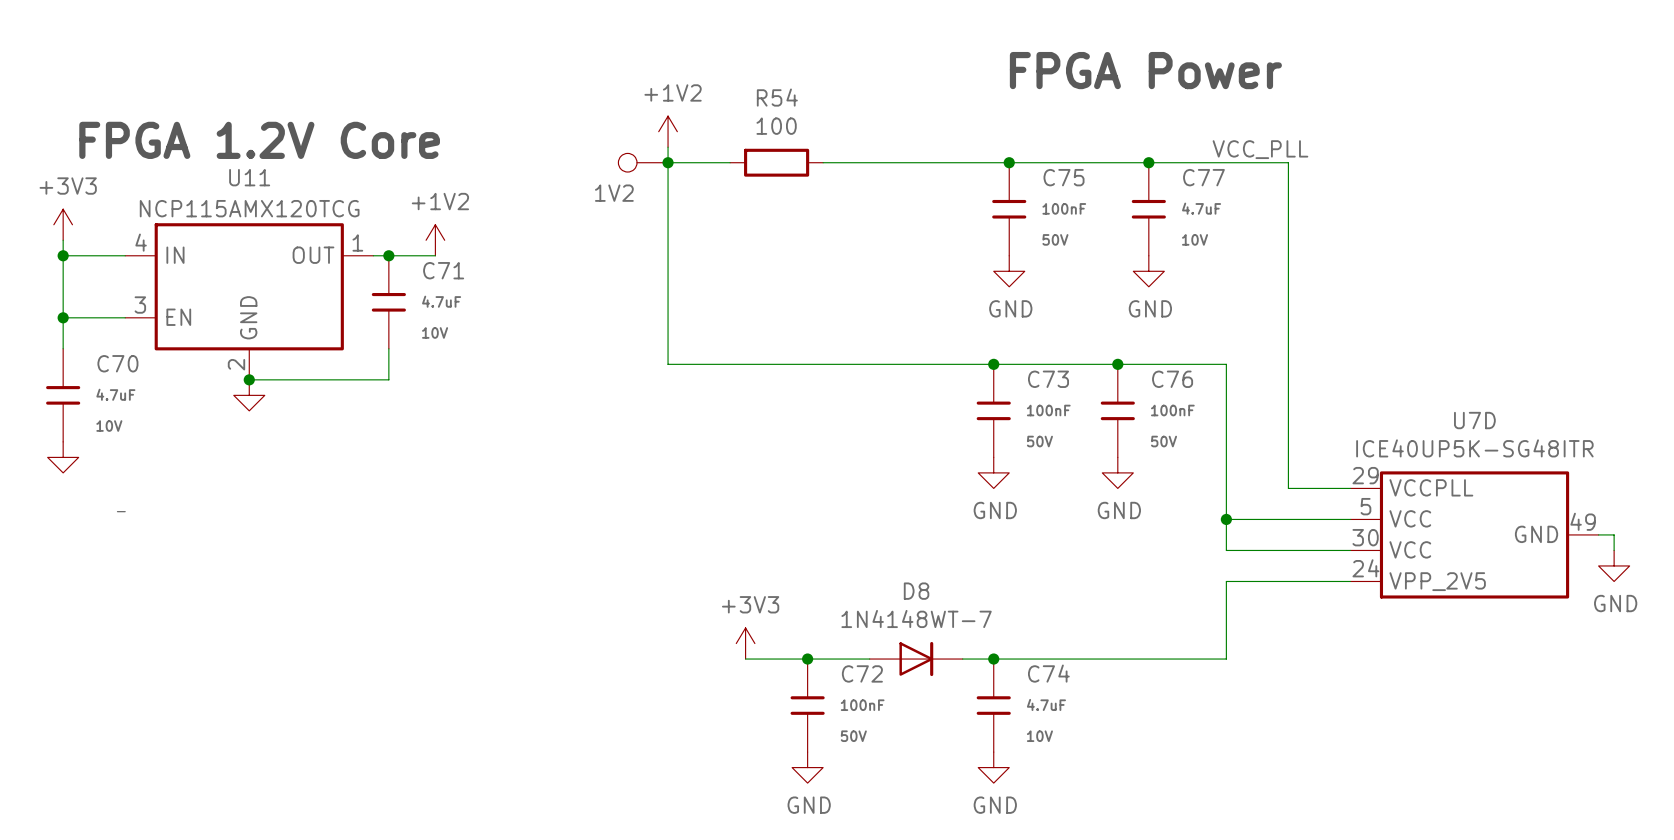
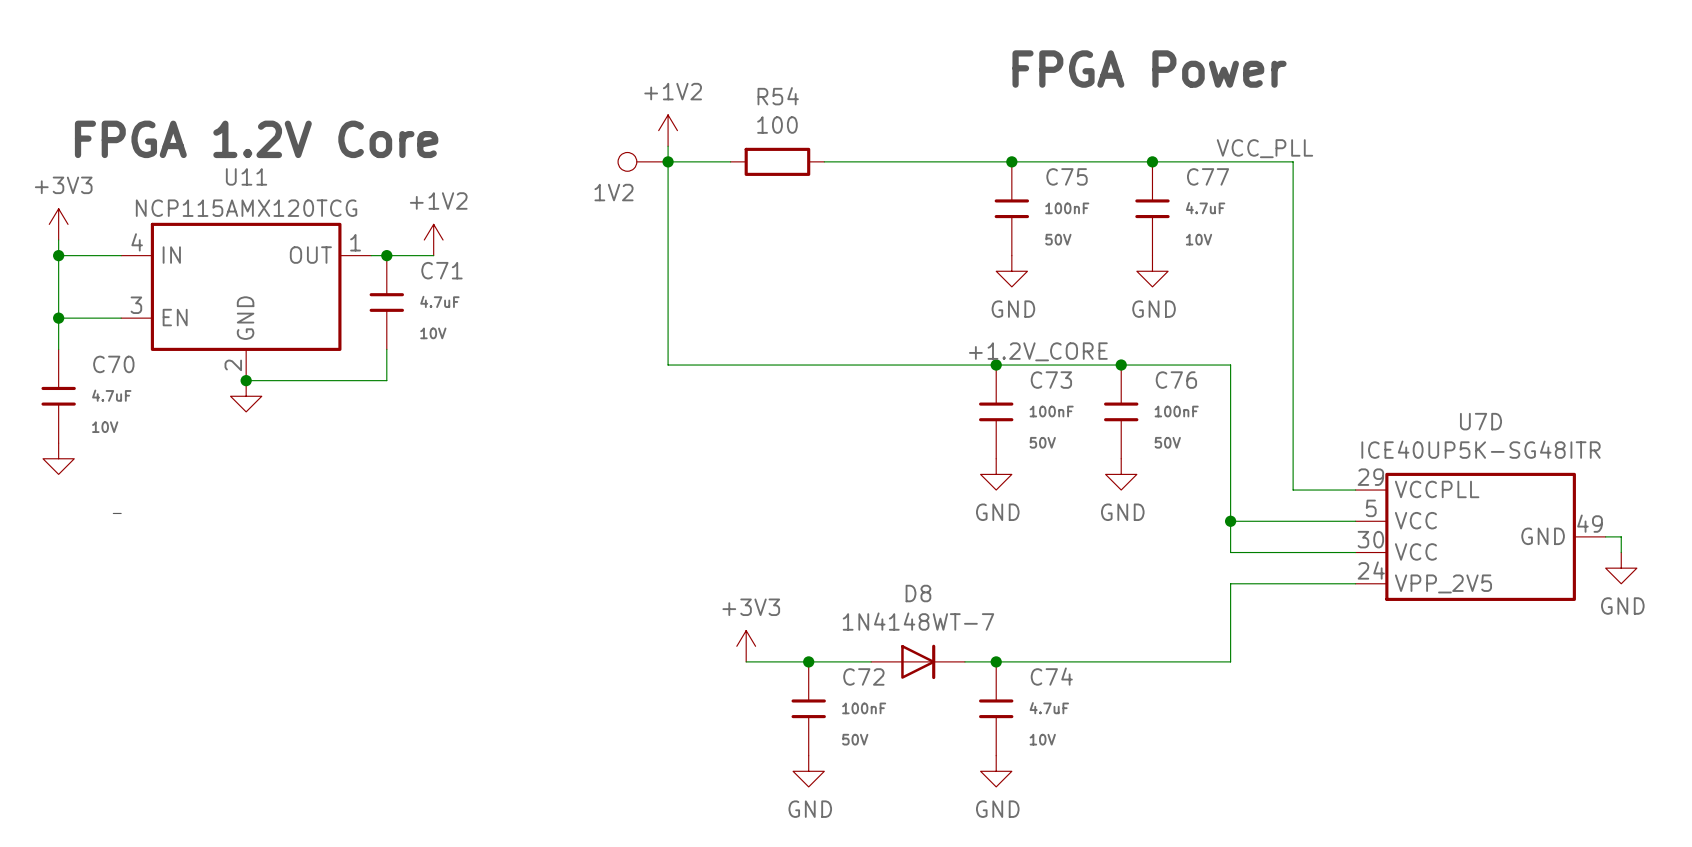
label: none -> +1.2V_CORE (1038, 351)

